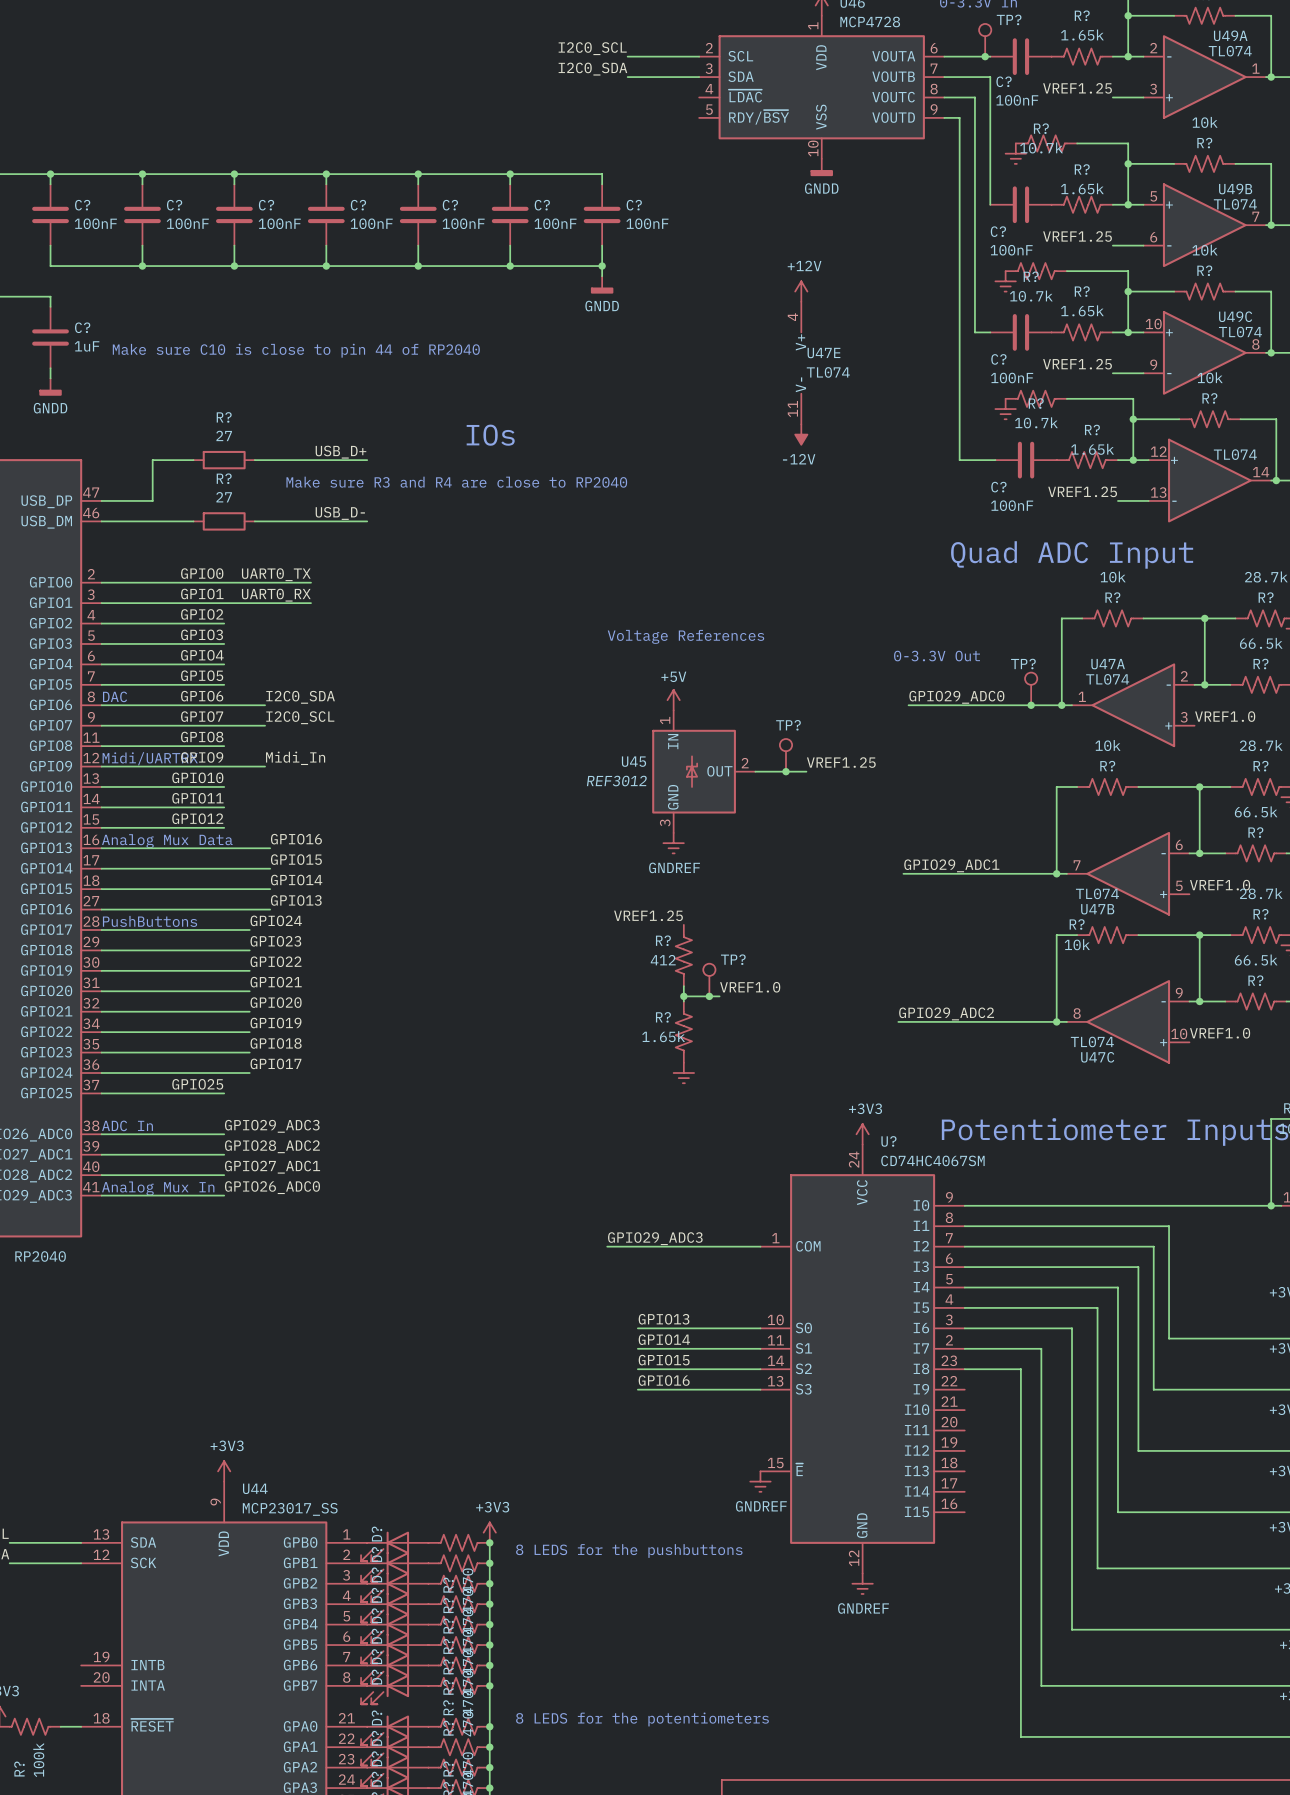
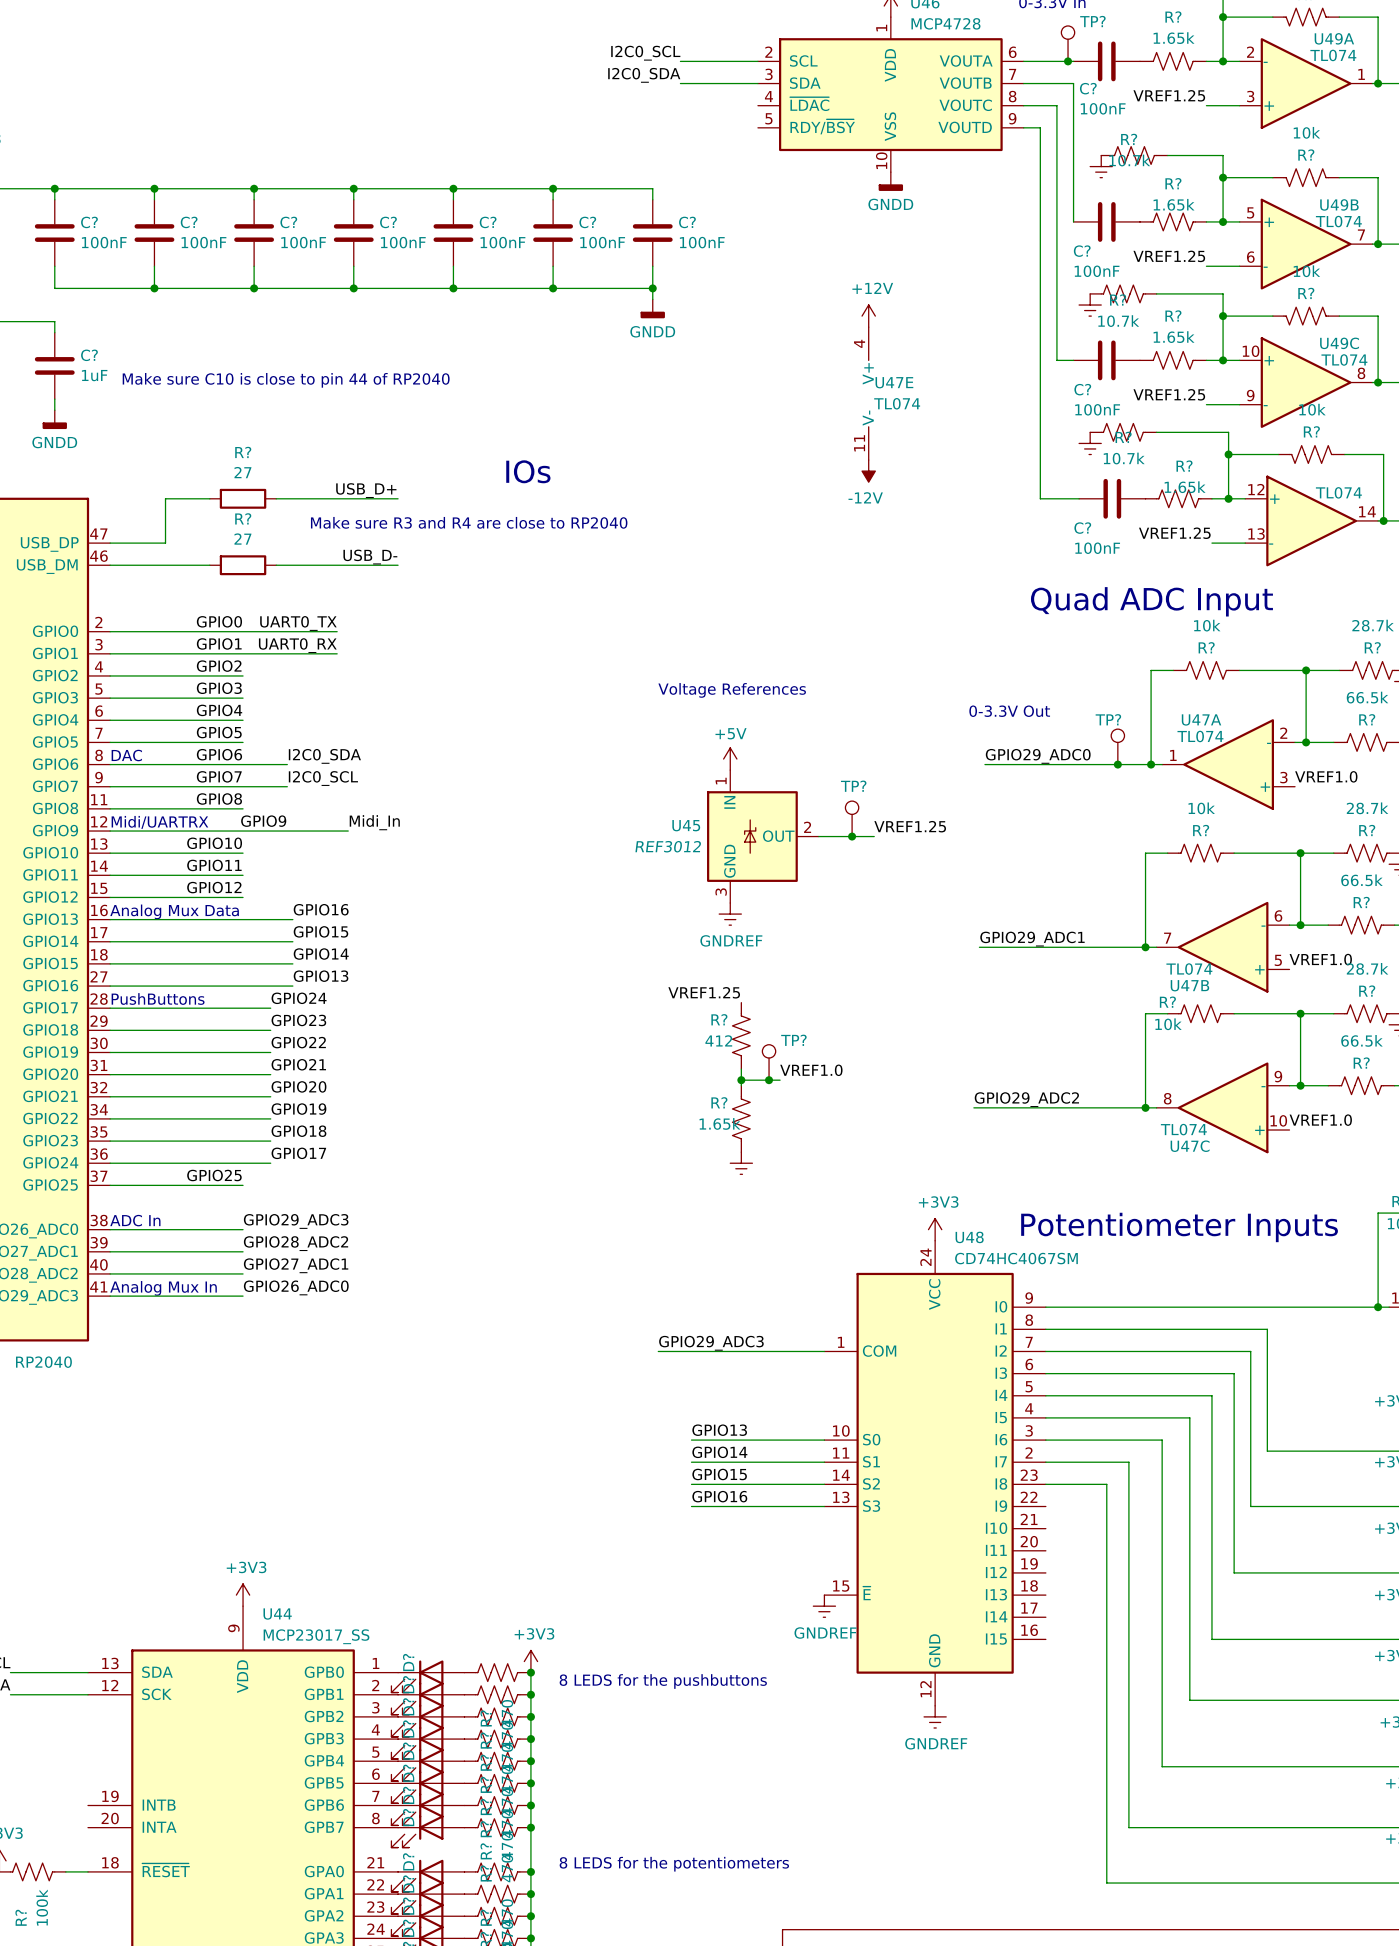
label: GPIO9 (202, 757) -> none
label: Midi_In (295, 758) -> GPIO9 (263, 821)
label: none -> Midi_In (374, 822)
wire: none -> (287, 831) (348, 831)
U? name: U? (888, 1141) -> U48 (969, 1237)

